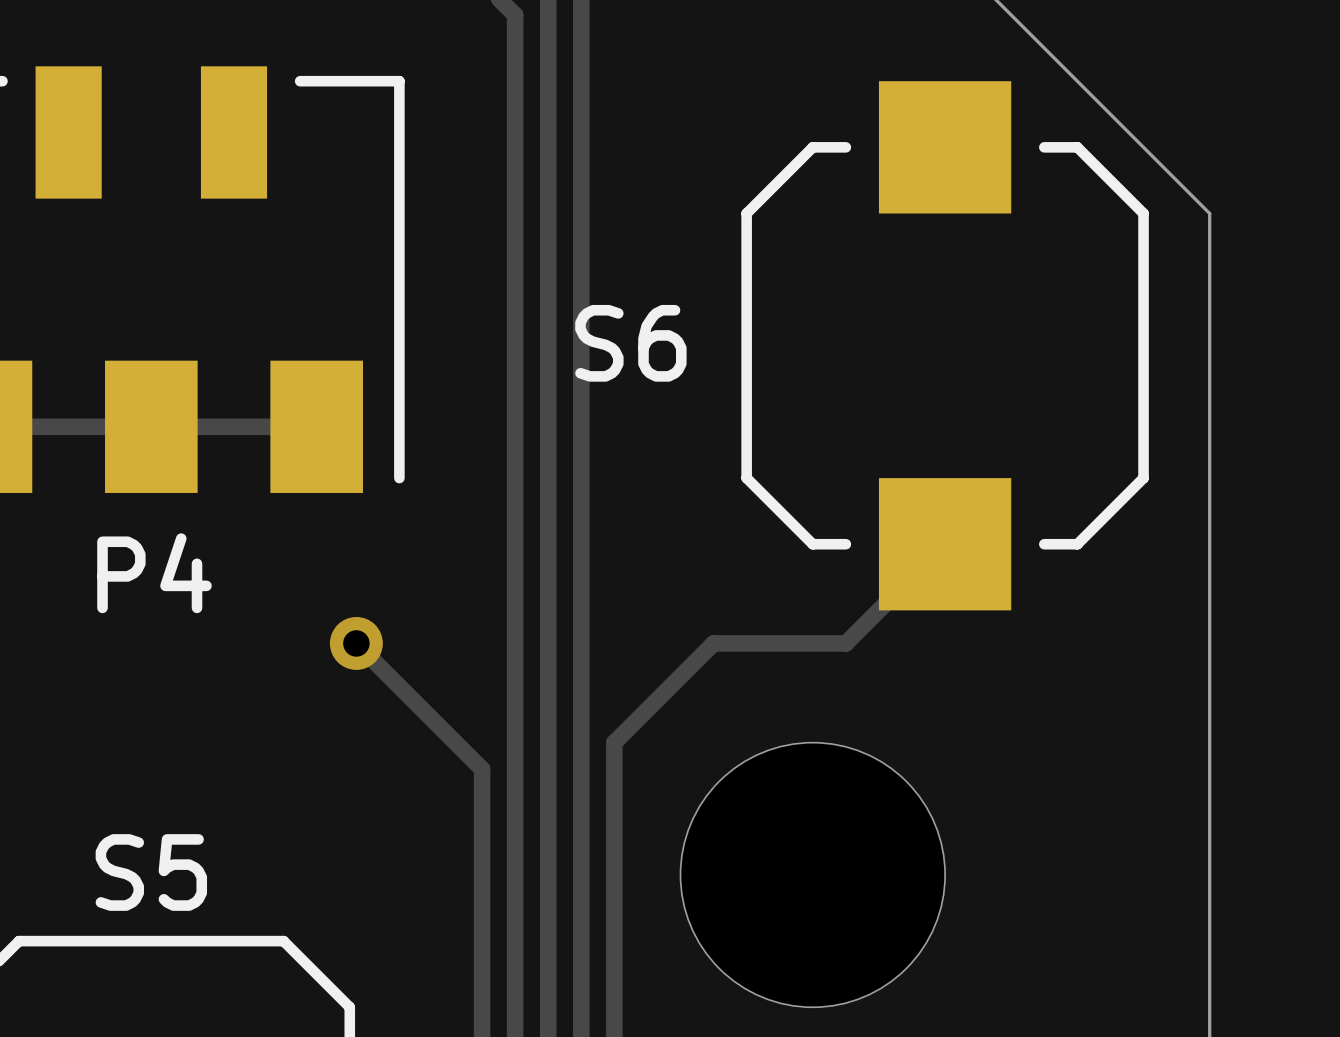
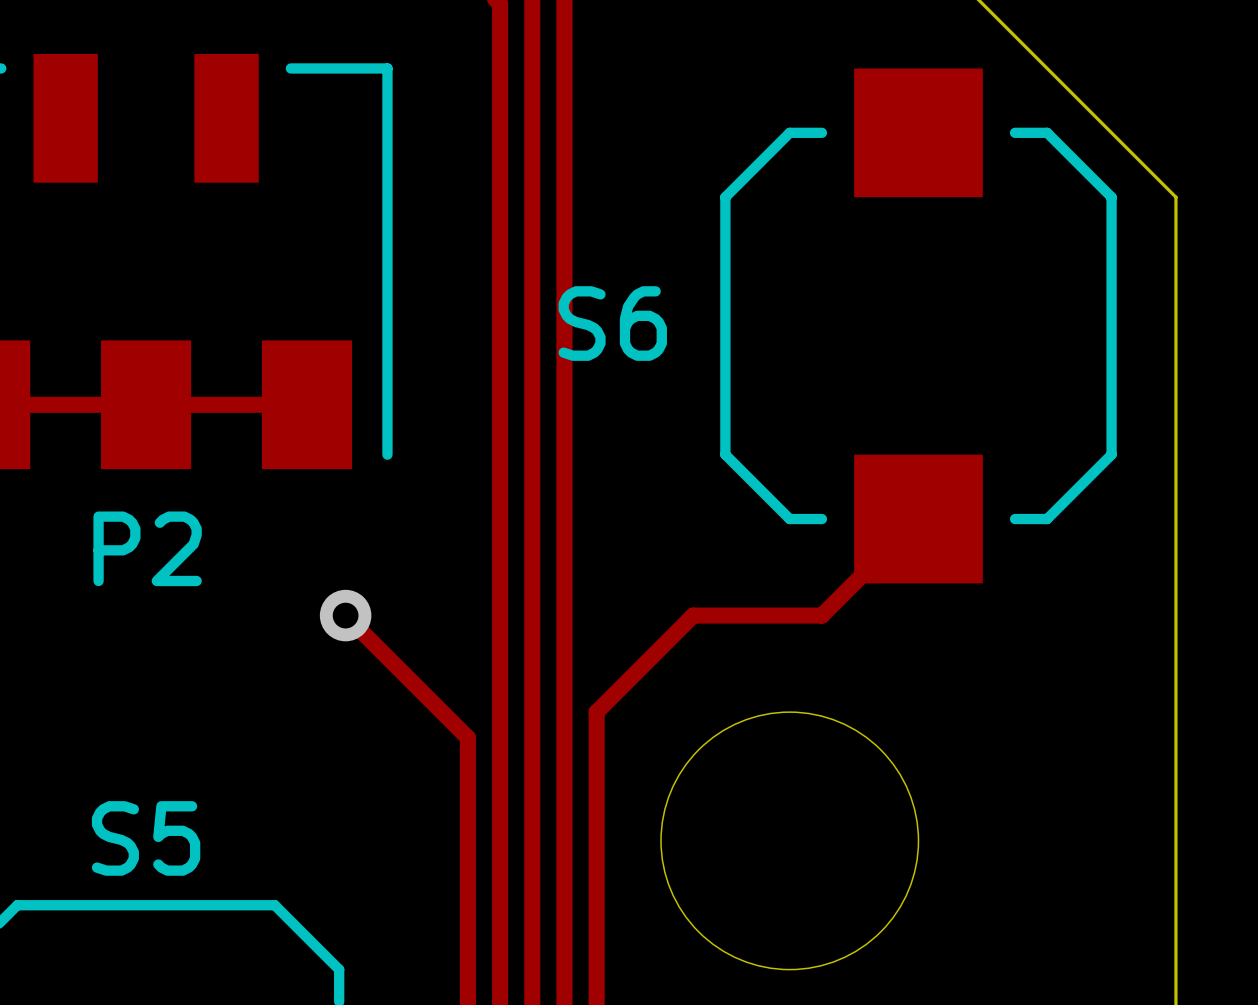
P4 name: P4 (154, 573) -> P2 (147, 548)

